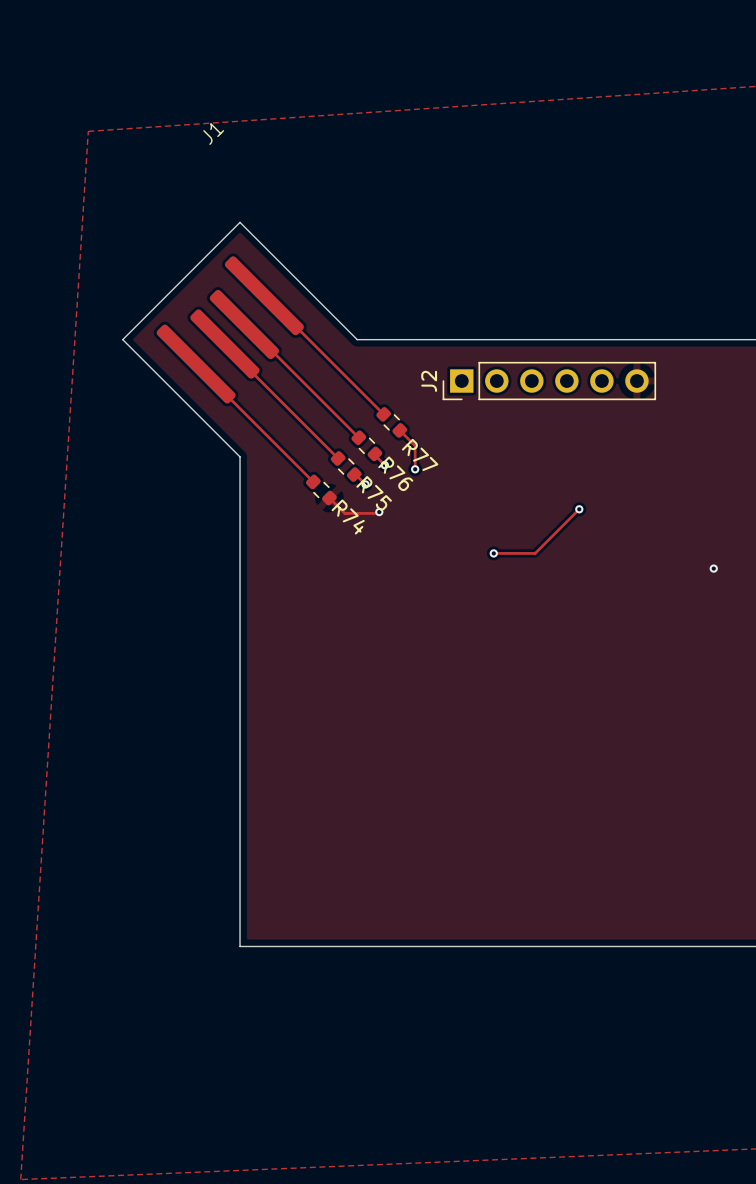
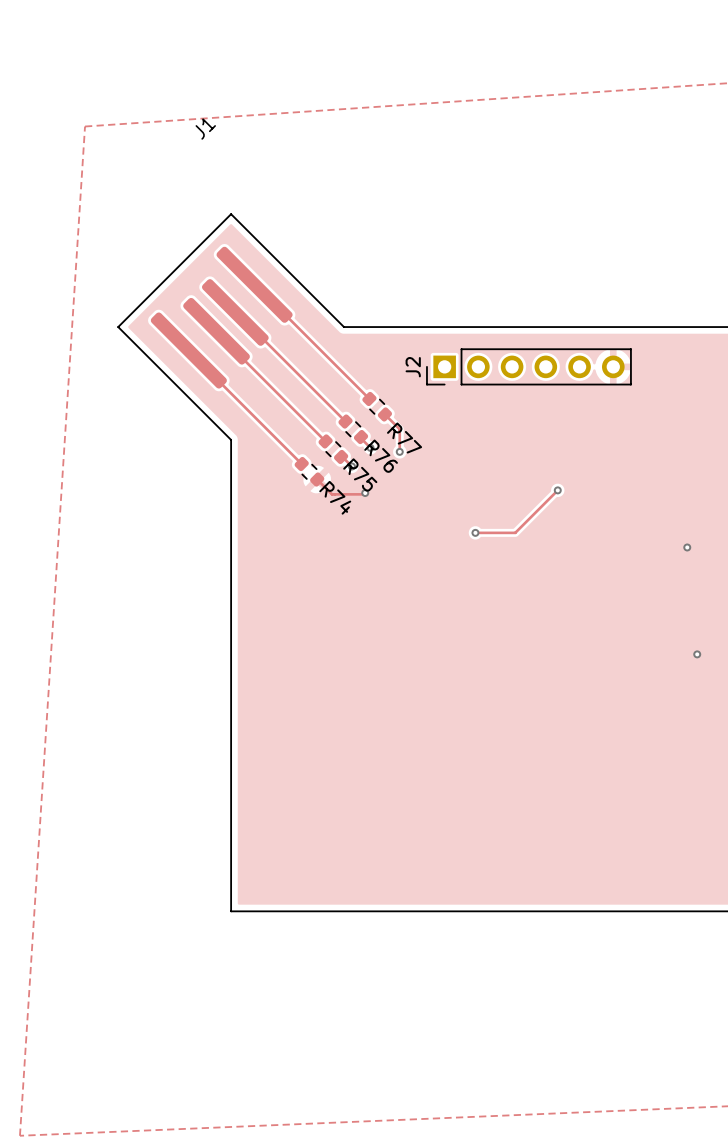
via: none -> (697, 654)

